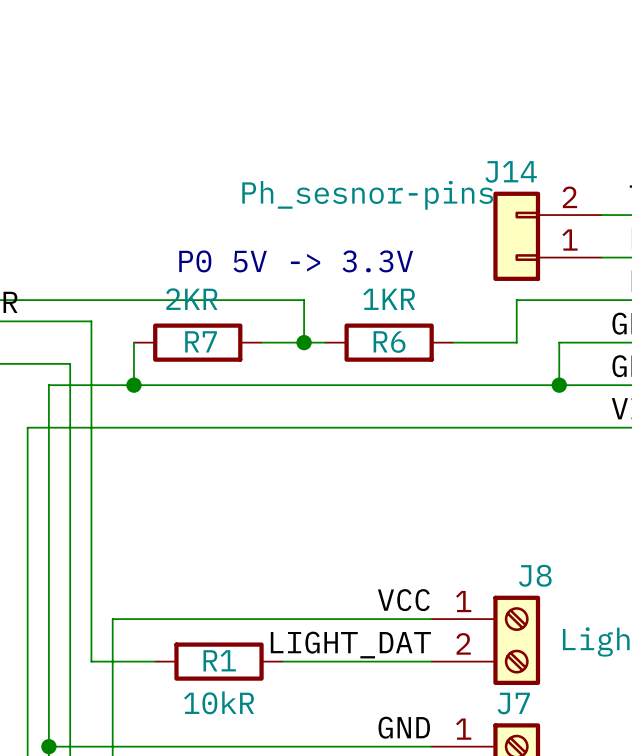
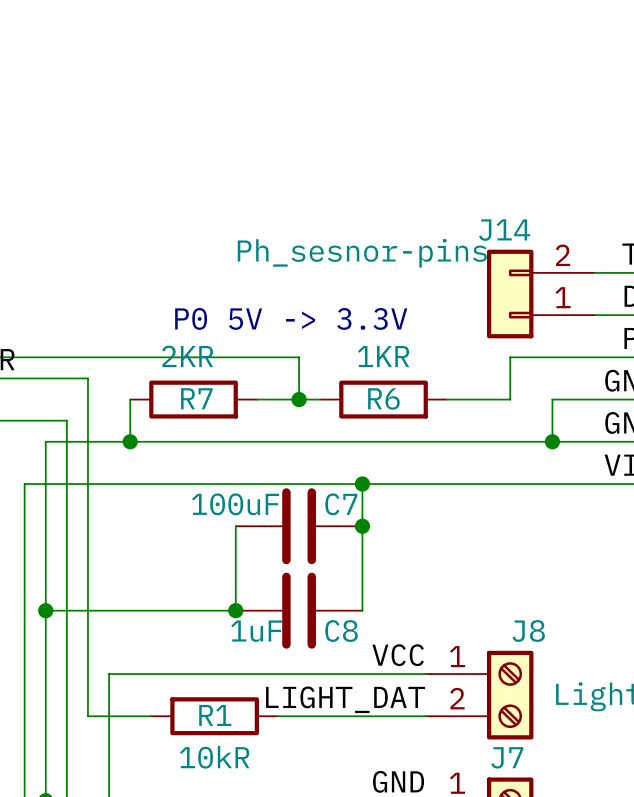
wire: none -> (362, 484) (362, 610)
junction: none -> (362, 484)
wire: none -> (235, 526) (235, 610) (45, 610)
C7: none -> 100uF (299, 526)
junction: none -> (362, 526)
junction: none -> (45, 610)
junction: none -> (235, 610)
C8: none -> 1uF (299, 610)

